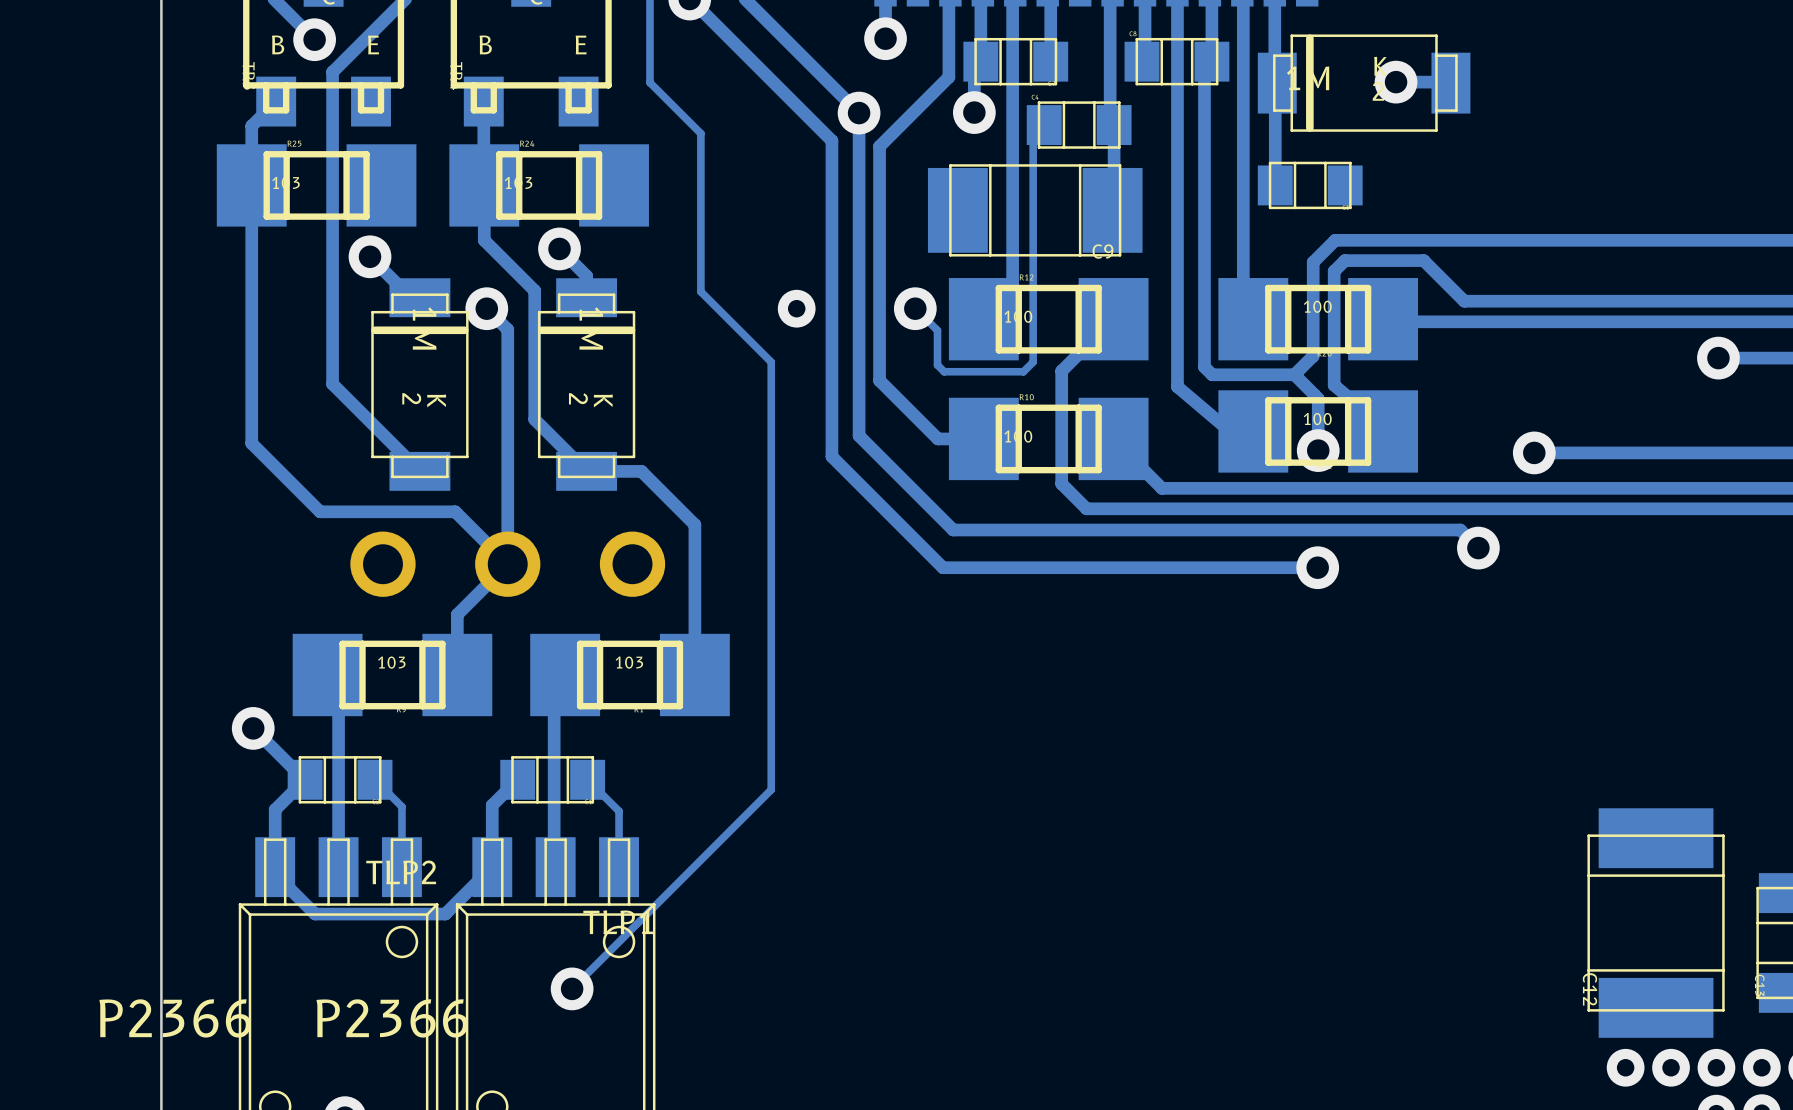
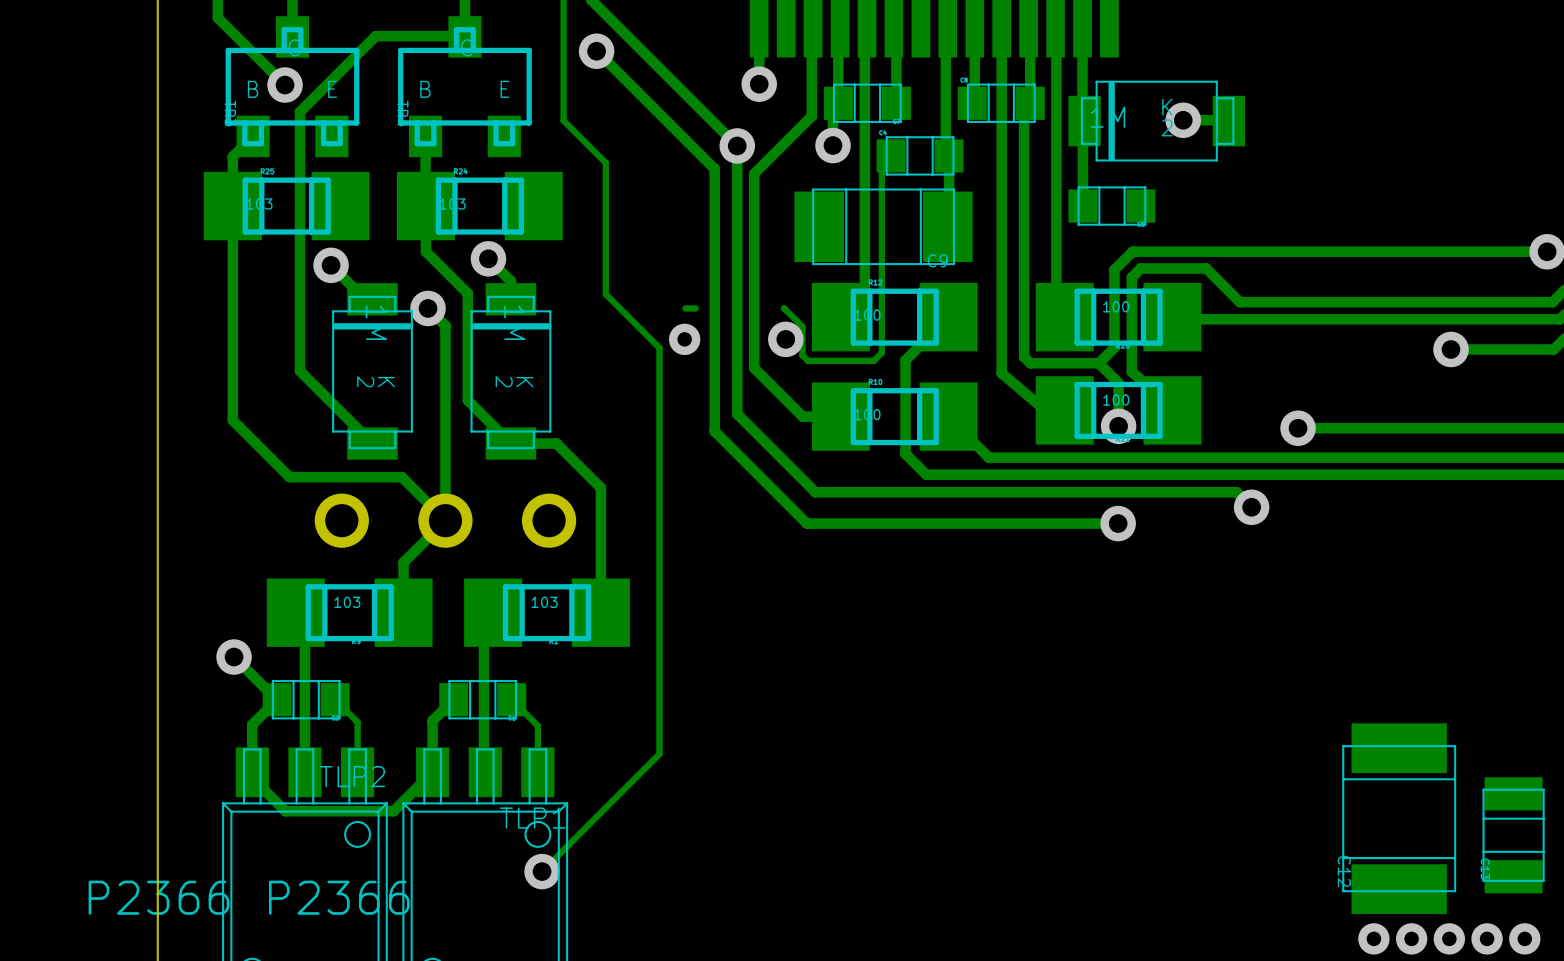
via position: (796, 308) -> (684, 339)
via position: (915, 308) -> (785, 339)
track: (765, 356) (771, 362) (771, 789) (572, 988) -> (659, 348) (659, 754) (542, 871)
via position: (572, 988) -> (542, 871)

